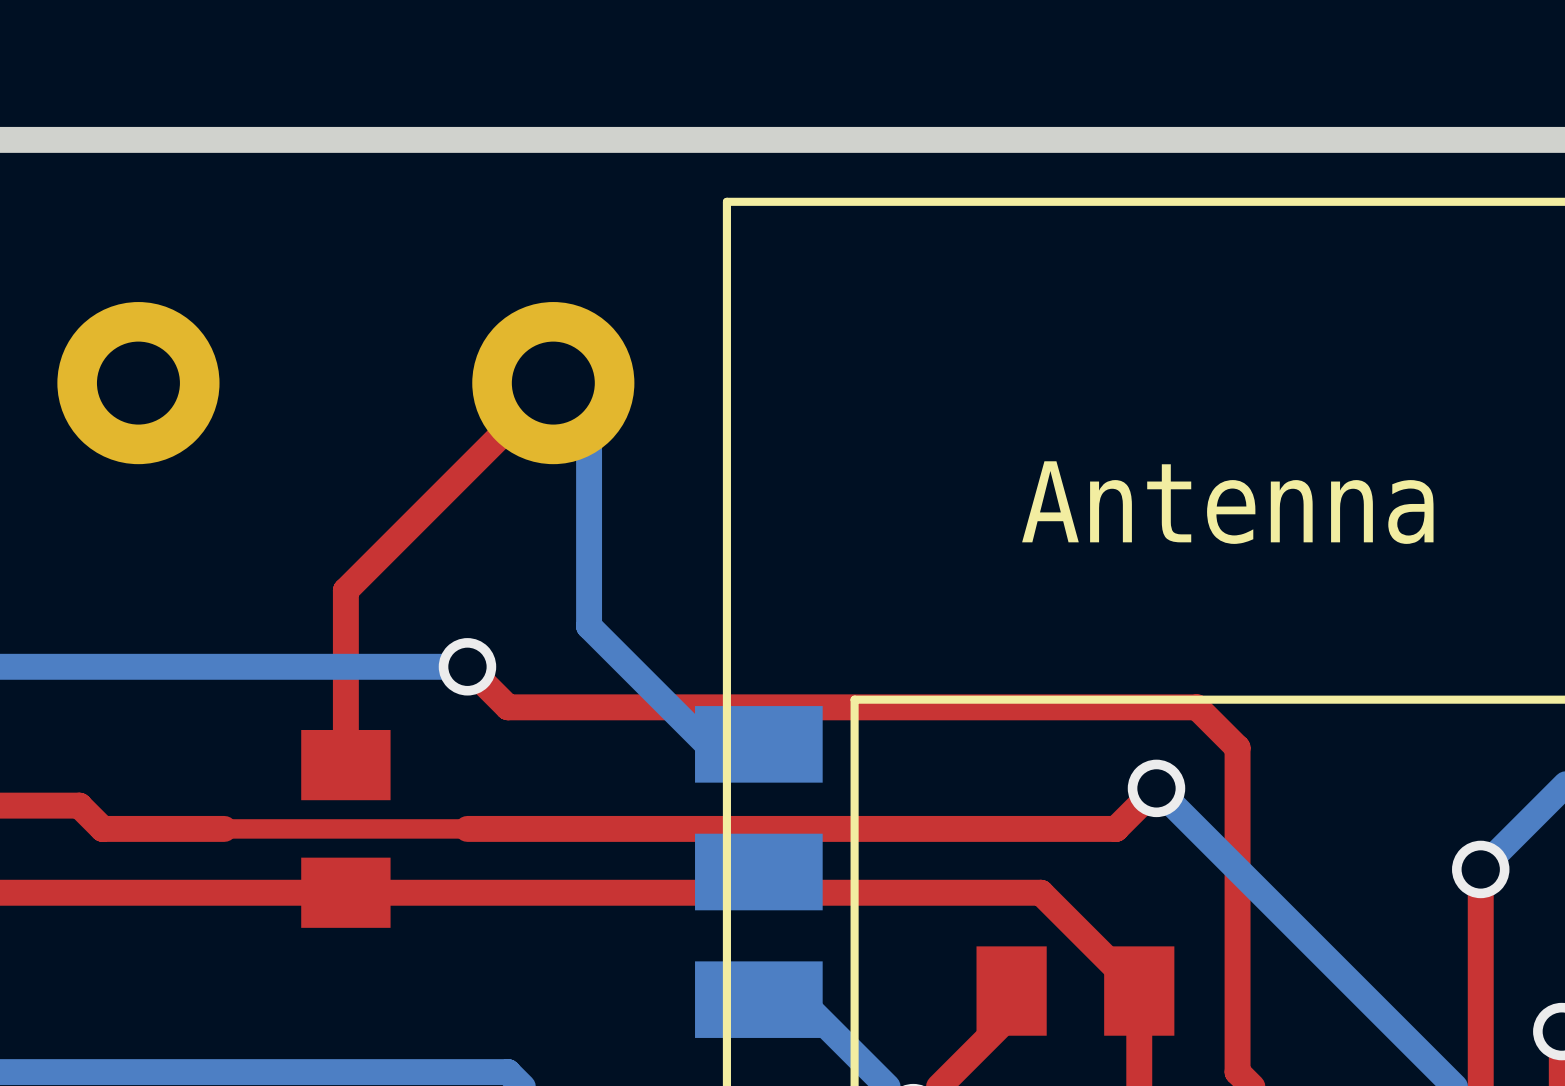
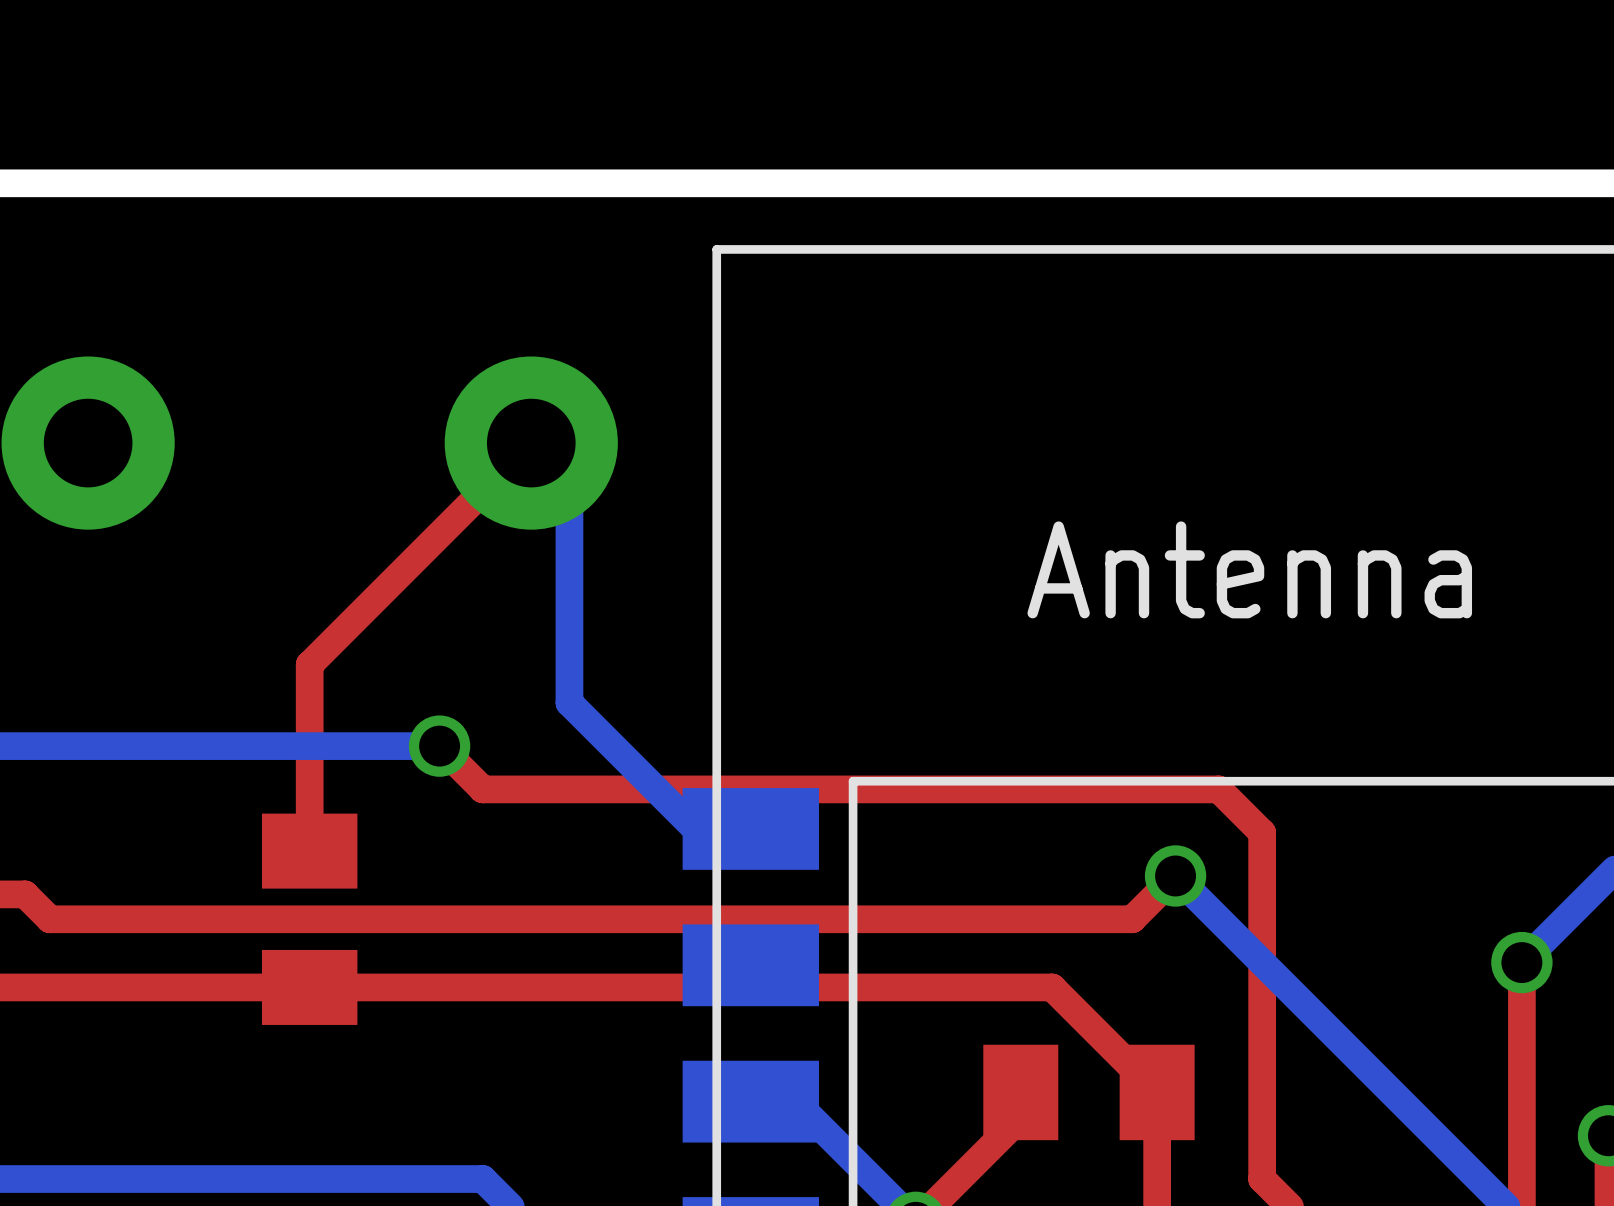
top track width: thin (467, 828) (224, 828) -> thick (439, 919) (179, 919)

